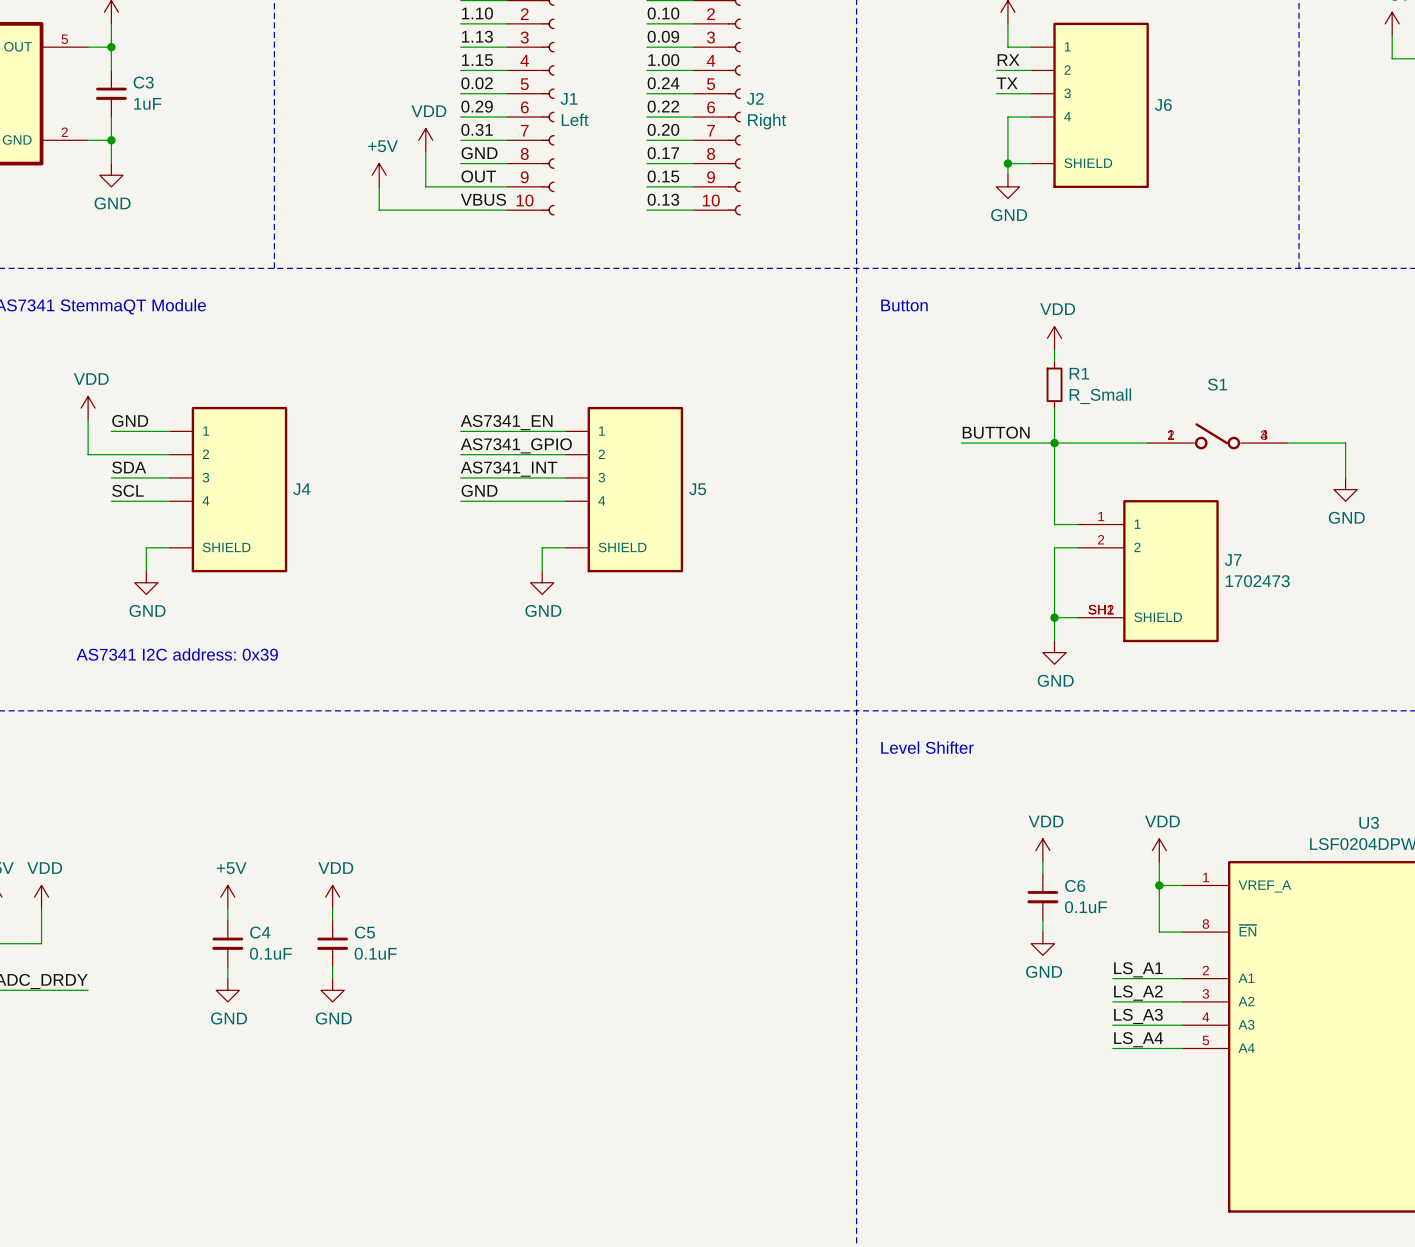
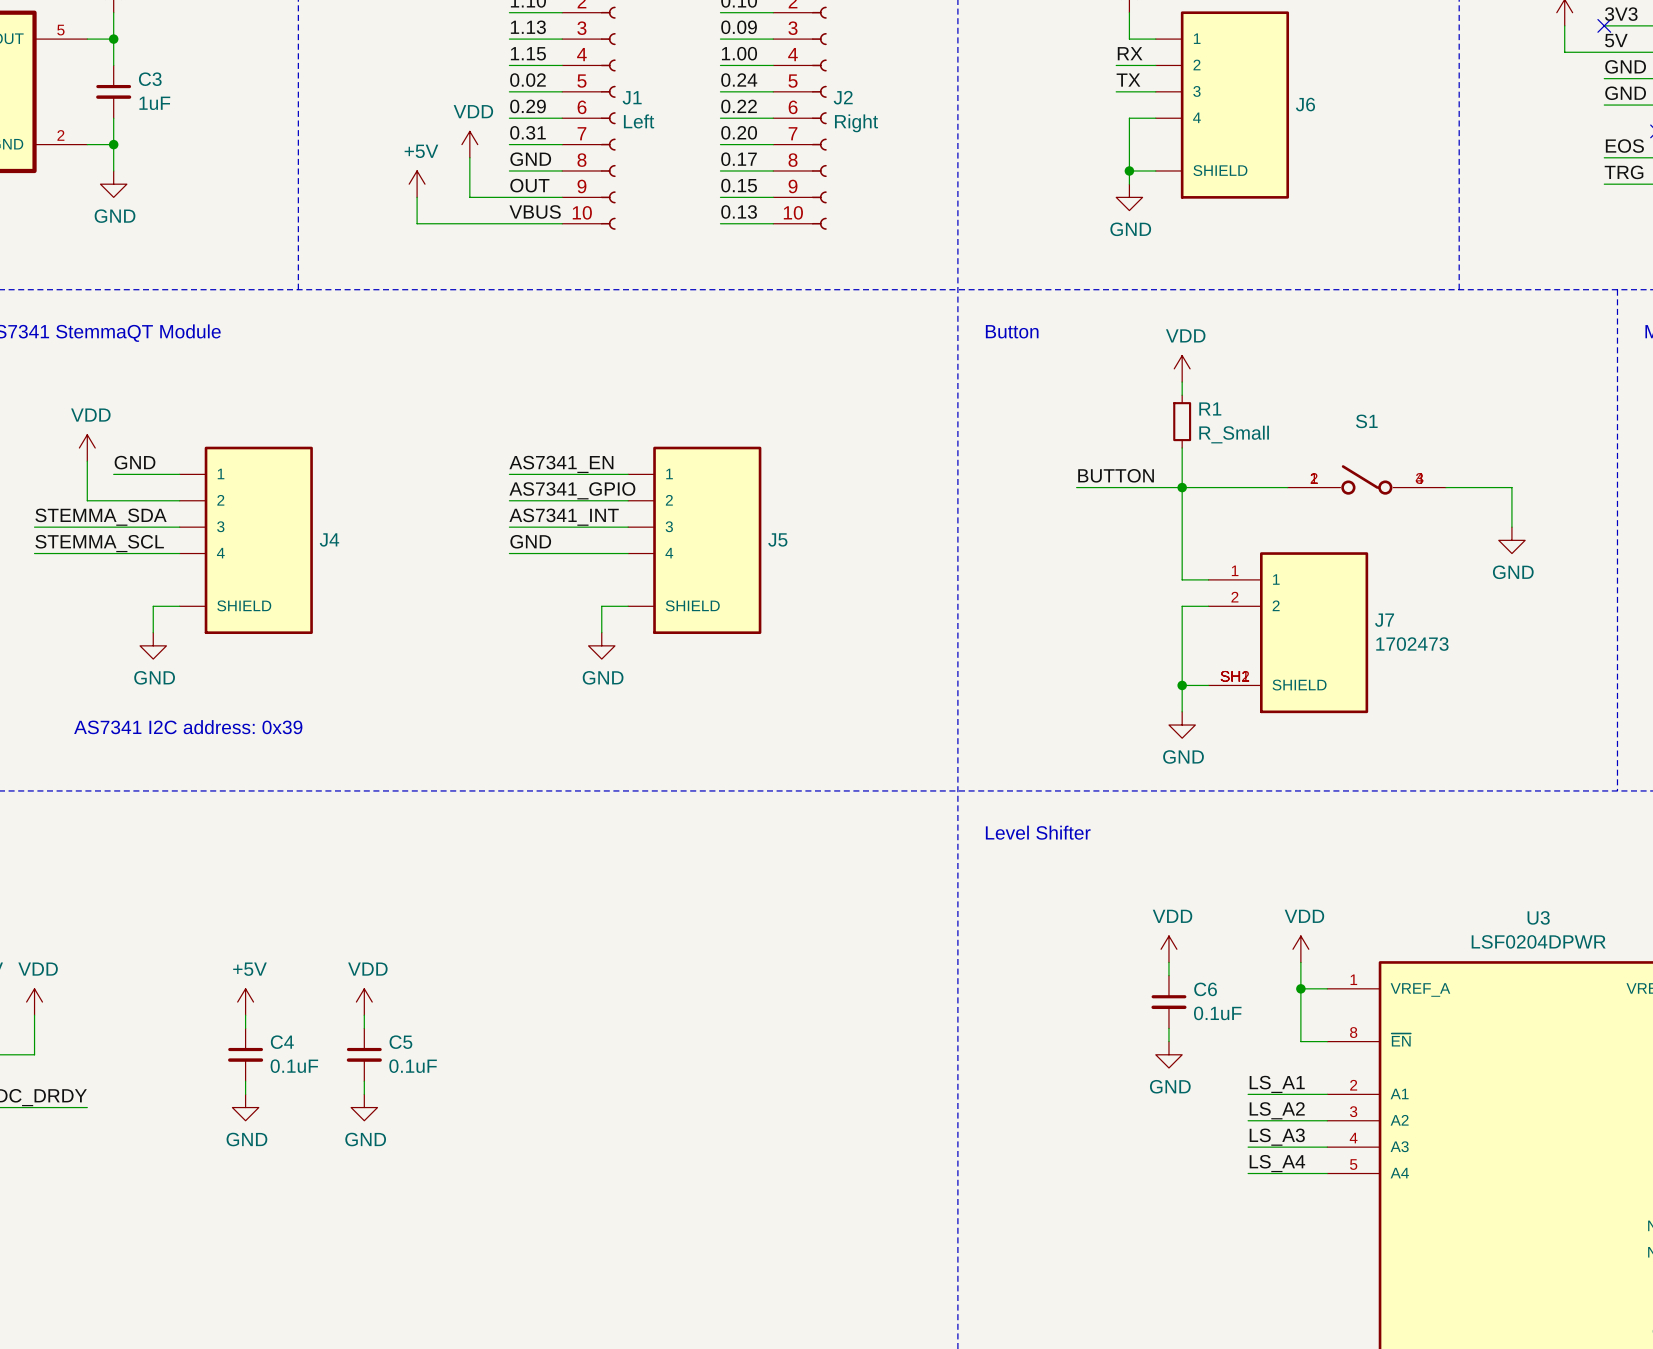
label: SDA (129, 467) -> none
label: none -> STEMMA_SDA (101, 517)
wire: none -> (34, 527) (113, 527)
label: SCL (127, 490) -> none
label: none -> STEMMA_SCL (99, 543)
wire: none -> (34, 553) (113, 553)

